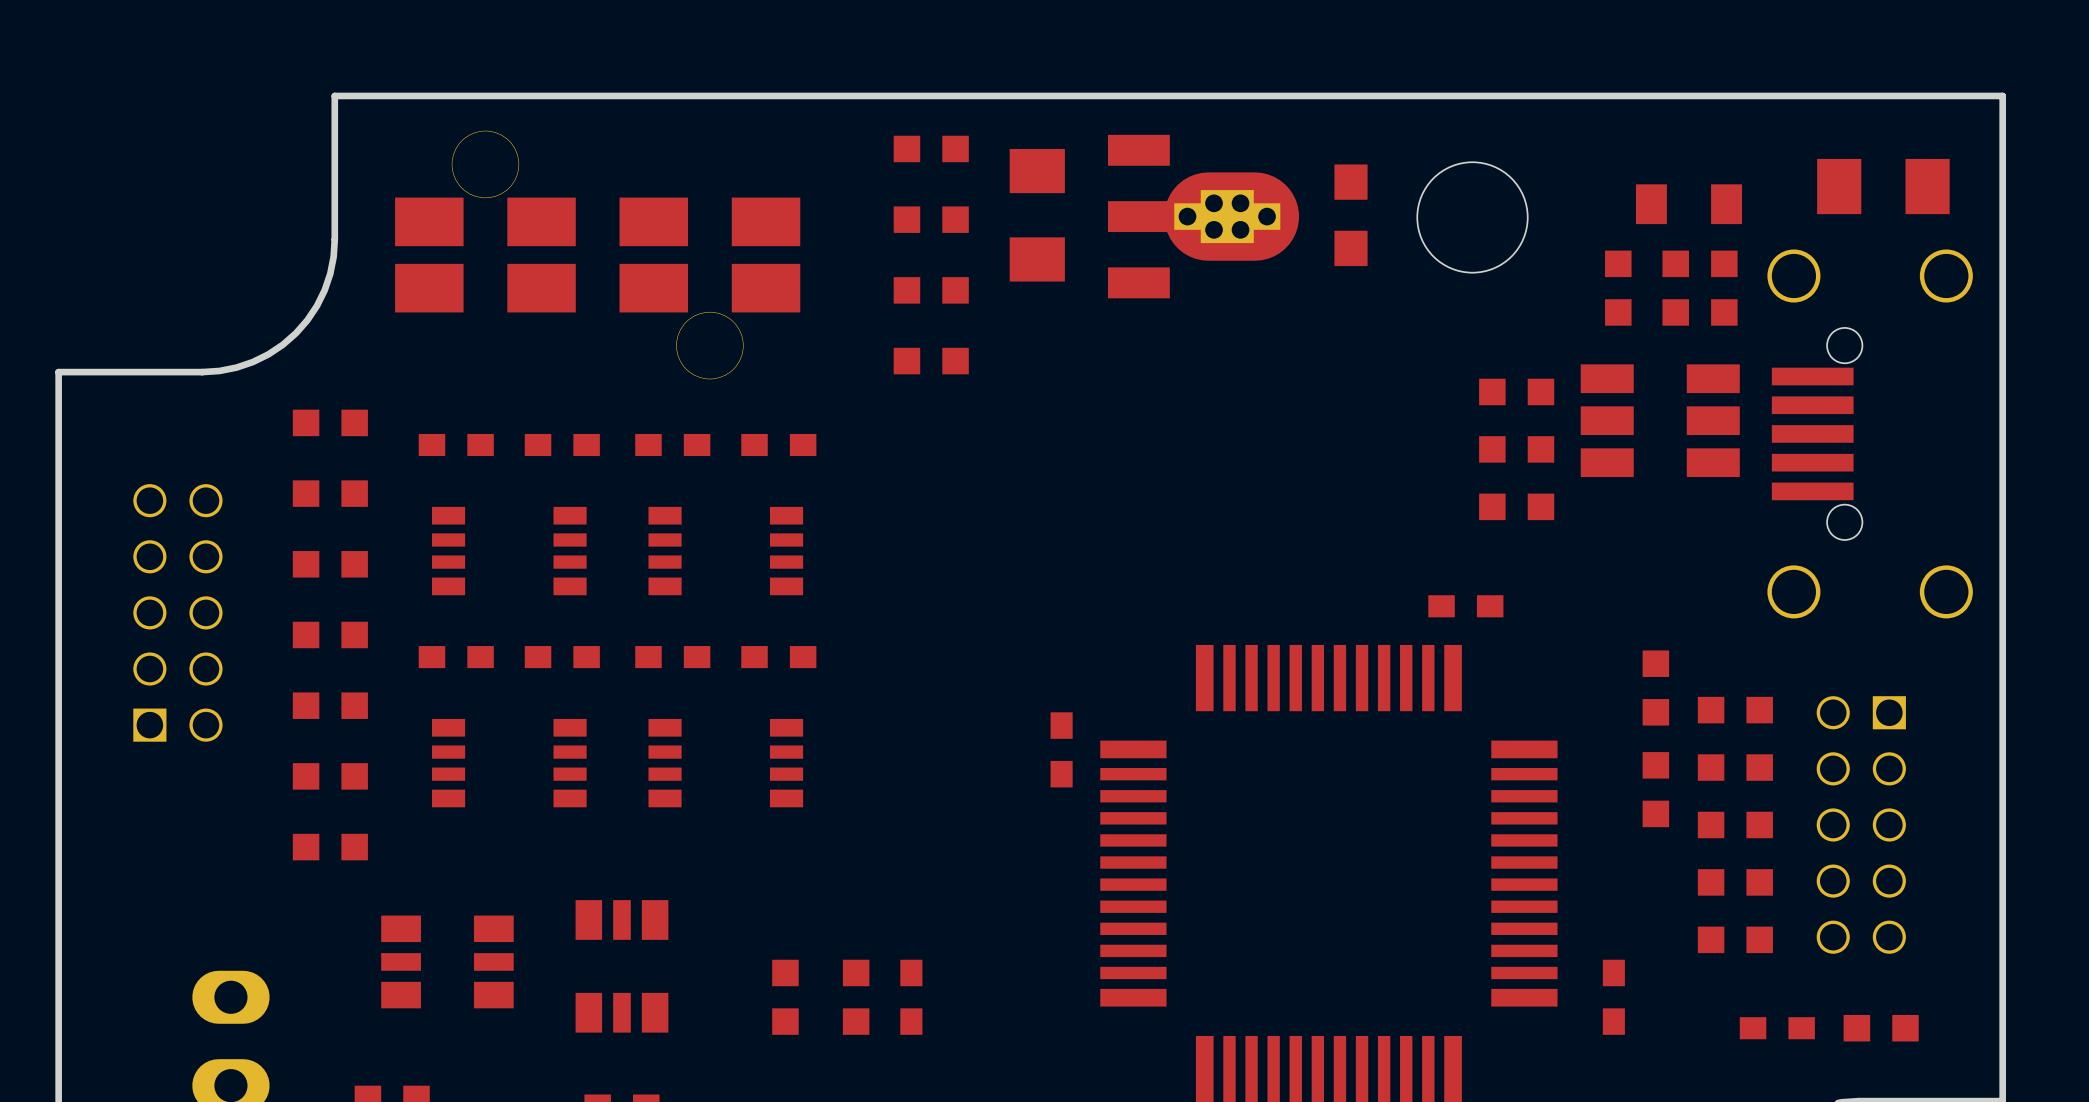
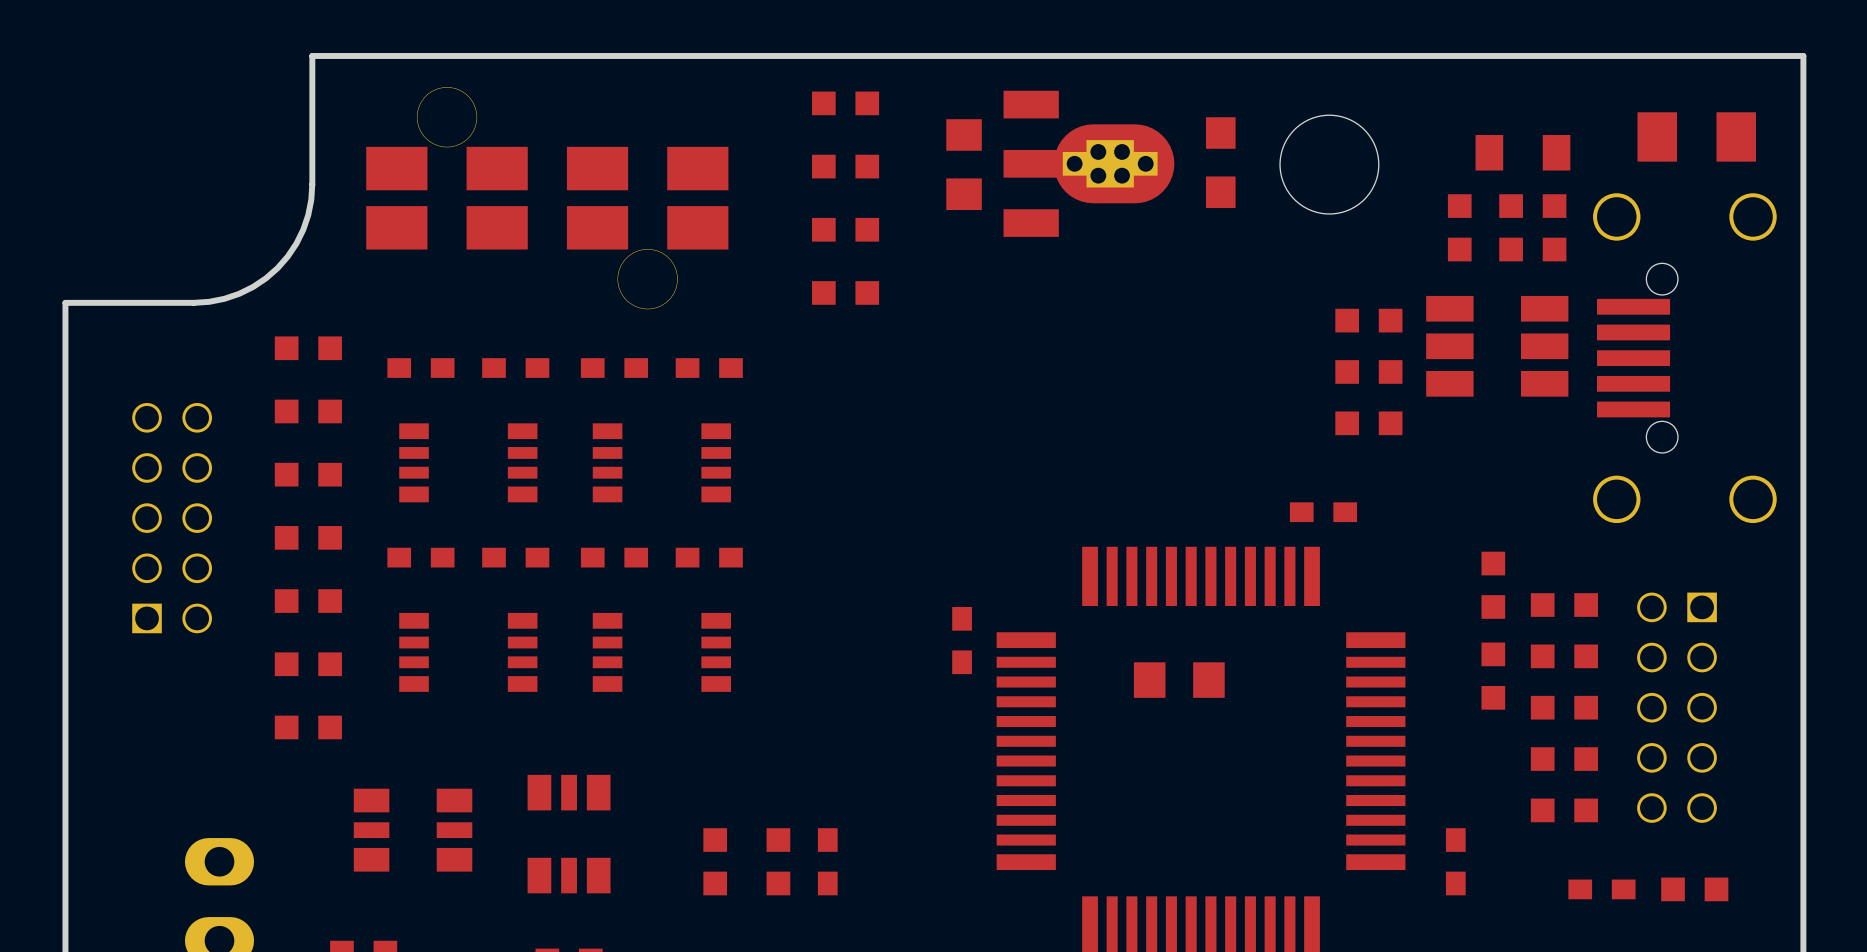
part footprint: [1009, 148, 1065, 282] -> [946, 119, 982, 211]
part: none -> (1179, 680)

